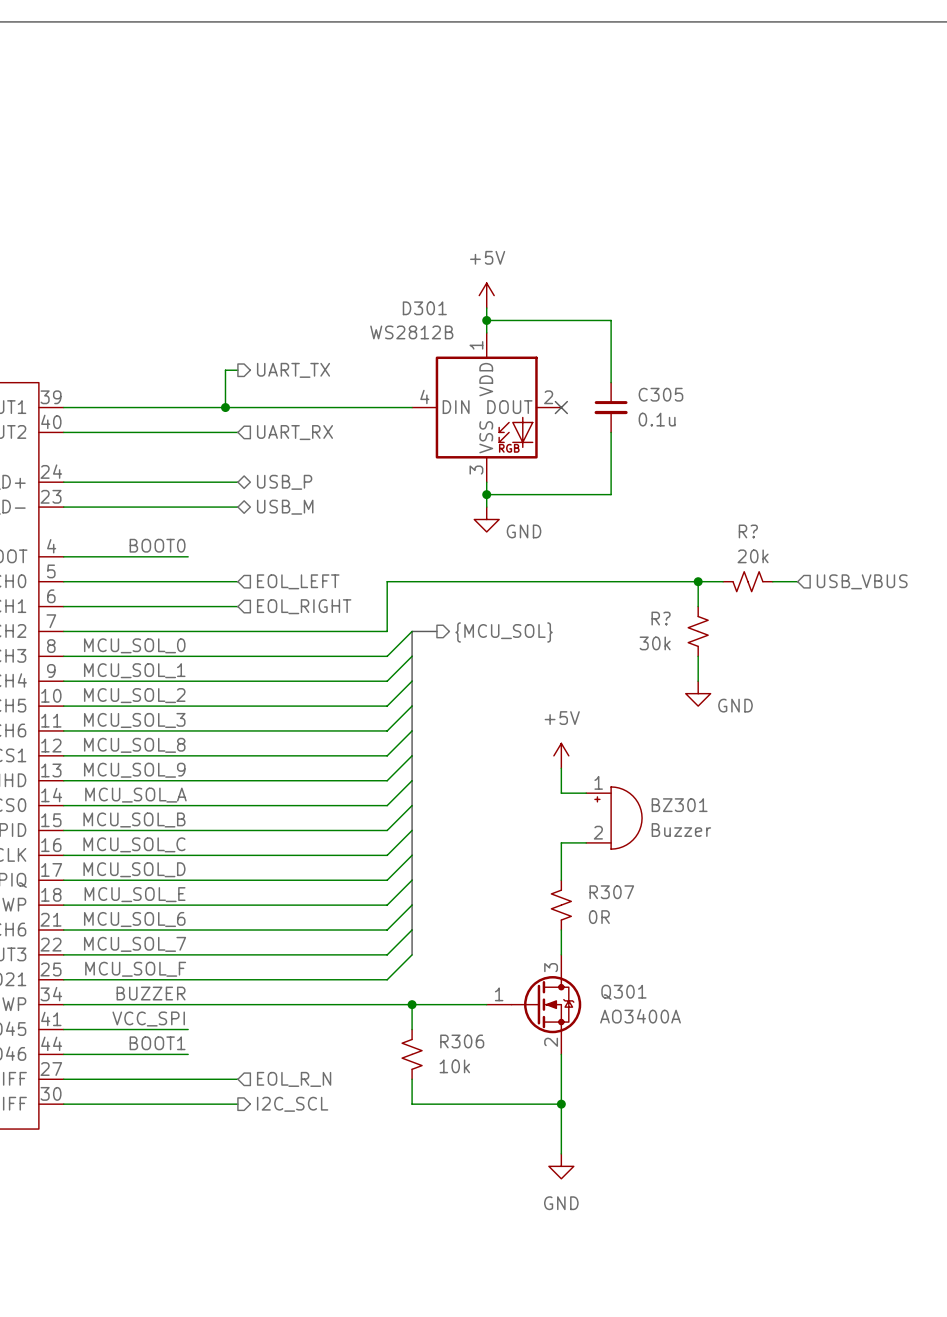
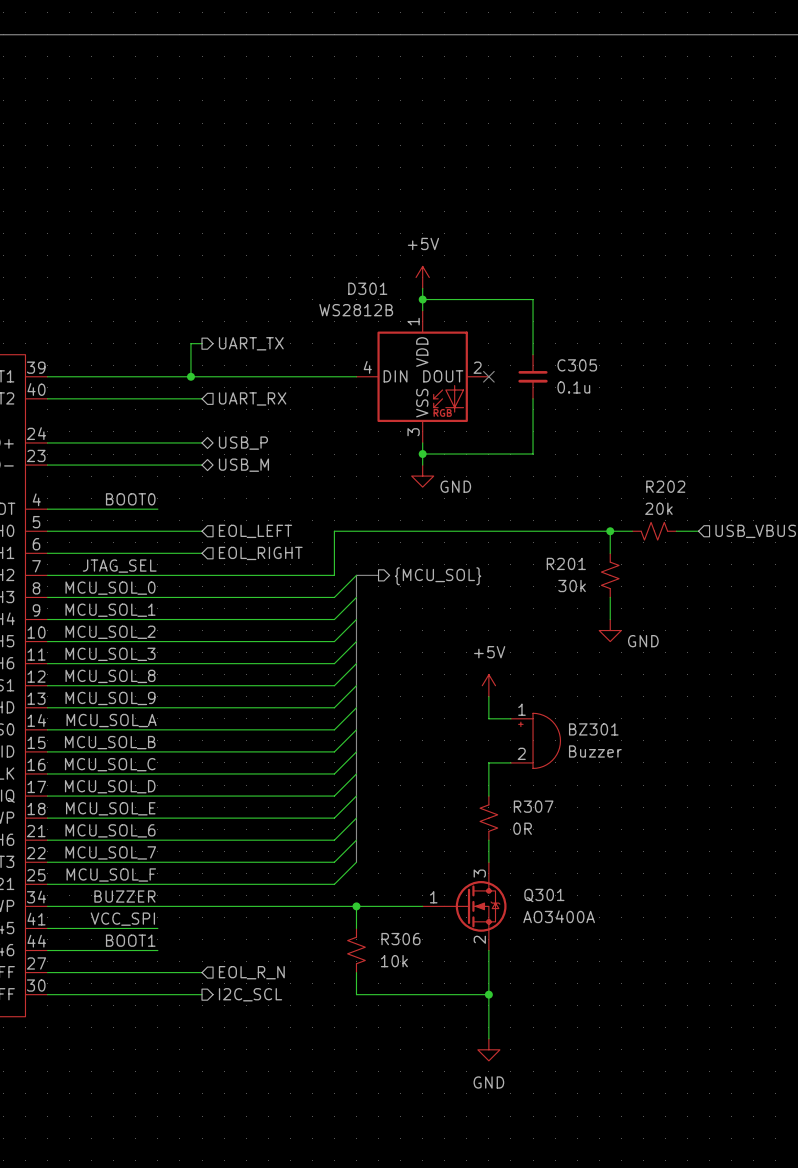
R? name: R? (748, 531) -> R202 (665, 486)
R? name: R? (661, 618) -> R201 (566, 563)
label: none -> JTAG_SEL (119, 566)

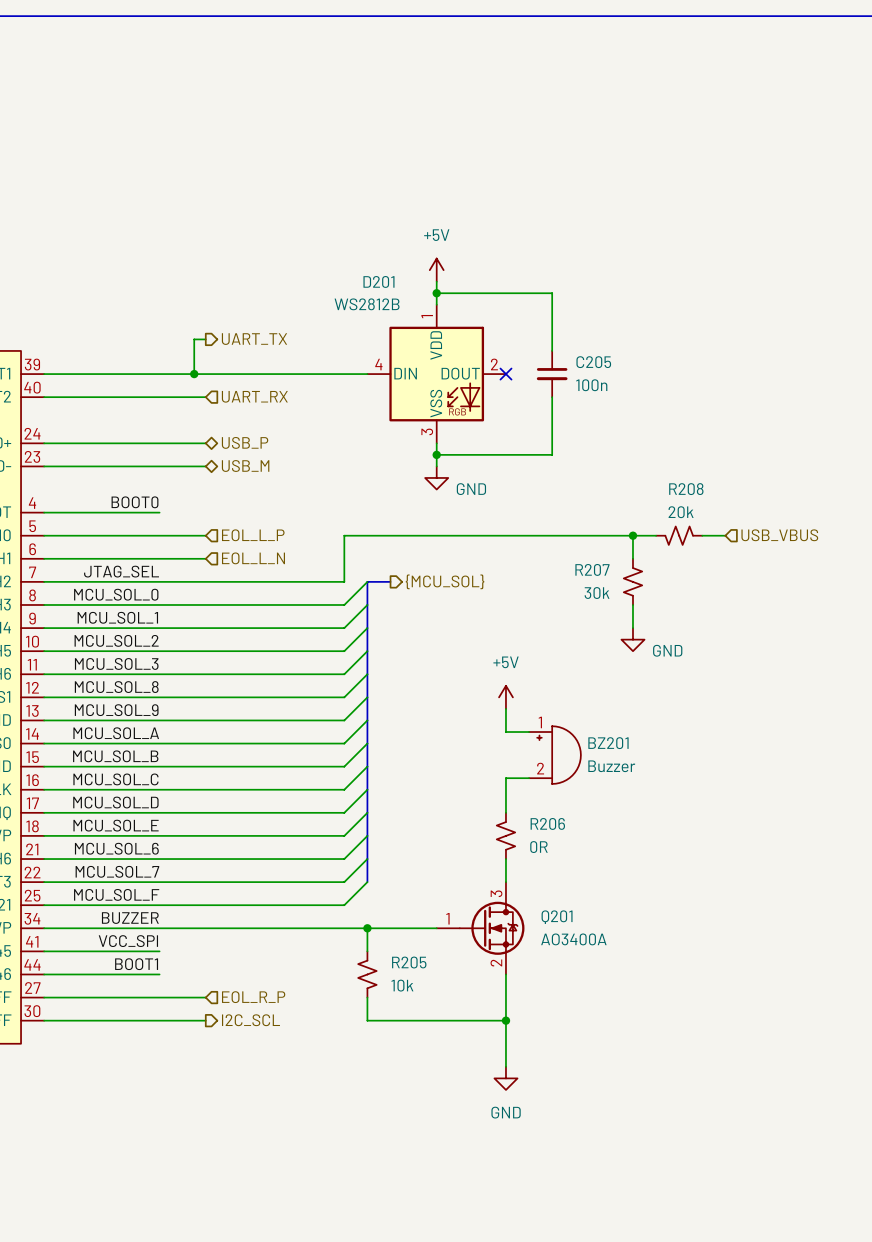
D301 name: D301 (367, 288) -> D201 (378, 281)
C305 name: C305 (577, 365) -> C205 (593, 362)
C305 value: 0.1u (573, 387) -> 100n (591, 385)
R202 name: R202 (665, 486) -> R208 (686, 489)
hierarchical label: EOL_LEFT (255, 531) -> EOL_L_P (253, 535)
hierarchical label: EOL_RIGHT (260, 553) -> EOL_L_N (253, 558)
R201 name: R201 (566, 563) -> R207 (592, 569)
BZ301 name: BZ301 (593, 729) -> BZ201 (608, 743)
R307 name: R307 (533, 806) -> R206 (547, 823)
Q301 name: Q301 (544, 895) -> Q201 (557, 917)
R306 name: R306 (400, 939) -> R205 (409, 962)
hierarchical label: EOL_R_N (251, 972) -> EOL_R_P (253, 997)

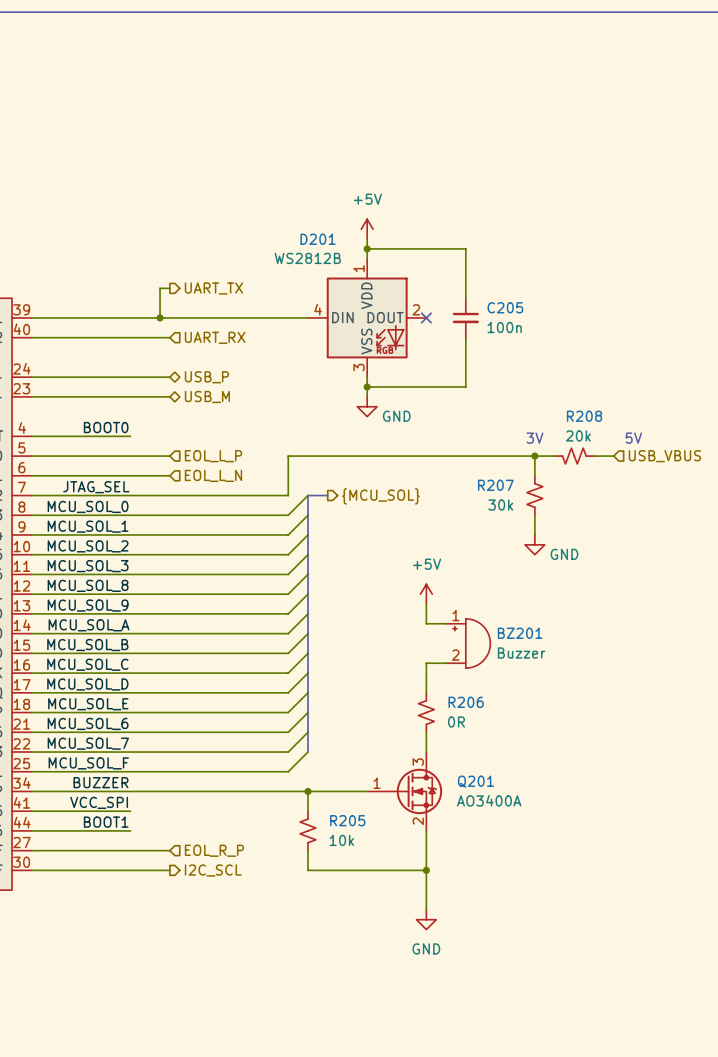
text: none -> 3V (534, 438)
text: none -> 5V (633, 438)

